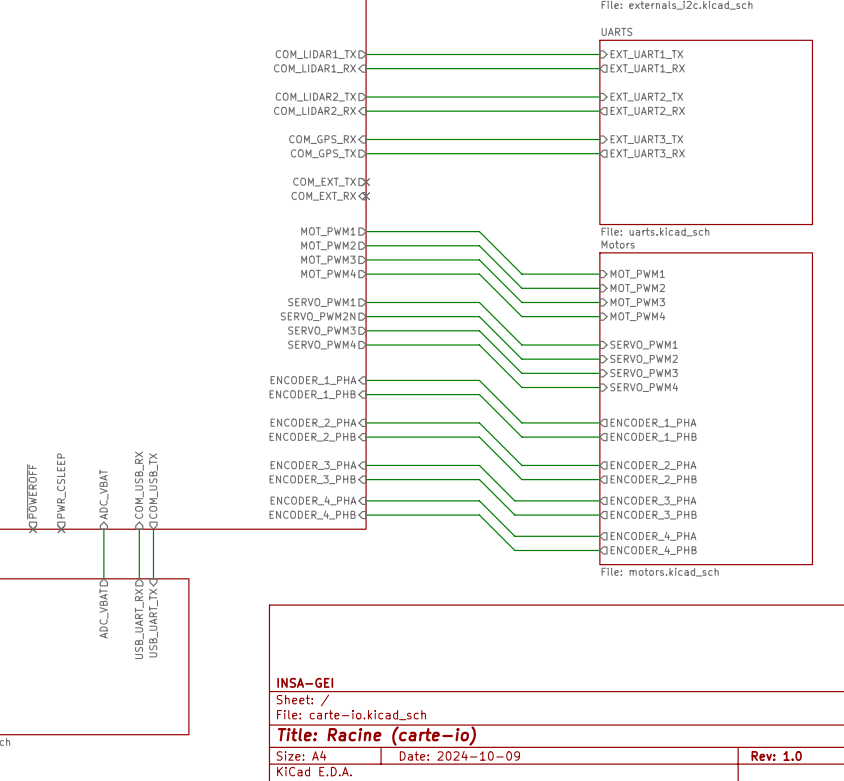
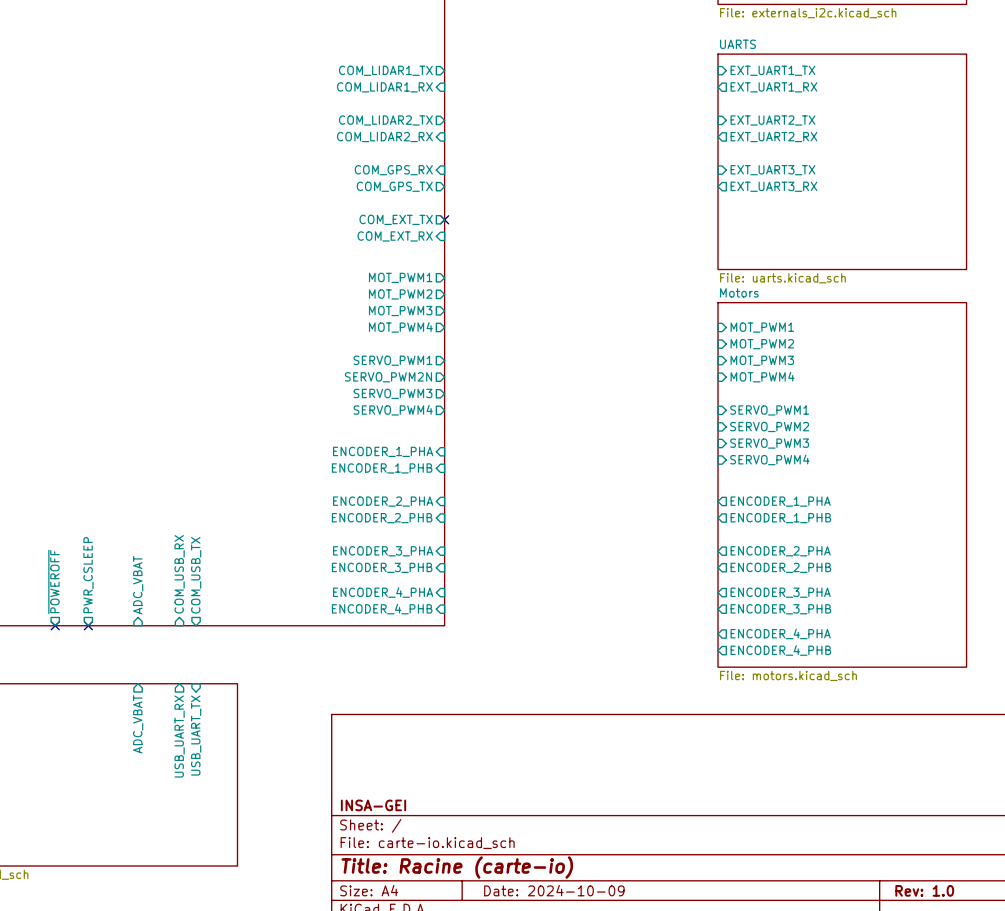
wire: (366, 54) (599, 54) -> none
wire: (366, 68) (599, 68) -> none
wire: (366, 96) (599, 96) -> none
wire: (366, 111) (599, 111) -> none
wire: (366, 139) (599, 139) -> none
wire: (366, 153) (599, 153) -> none
no-connect mark: (366, 196) -> none
wire: (366, 231) (479, 231) (521, 274) (599, 274) -> none
wire: (366, 245) (479, 245) (521, 288) (599, 288) -> none
wire: (366, 259) (479, 259) (521, 302) (599, 302) -> none
wire: (366, 274) (479, 274) (521, 316) (599, 316) -> none
wire: (366, 302) (479, 302) (521, 344) (599, 344) -> none
wire: (366, 316) (479, 316) (521, 359) (599, 359) -> none
wire: (366, 330) (479, 330) (521, 373) (599, 373) -> none
wire: (366, 344) (479, 344) (521, 387) (599, 387) -> none
wire: (366, 380) (479, 380) (521, 422) (599, 422) -> none
wire: (366, 394) (479, 394) (521, 437) (599, 437) -> none
wire: (366, 422) (479, 422) (521, 465) (599, 465) -> none
wire: (366, 437) (479, 437) (521, 479) (599, 479) -> none
wire: (366, 465) (479, 465) (514, 500) (599, 500) -> none
wire: (366, 479) (479, 479) (514, 515) (599, 515) -> none
wire: (366, 500) (479, 500) (514, 536) (599, 536) -> none
wire: (366, 515) (479, 515) (514, 550) (599, 550) -> none
wire: (103, 529) (103, 578) -> none
wire: (139, 529) (139, 578) -> none
wire: (153, 529) (153, 578) -> none

